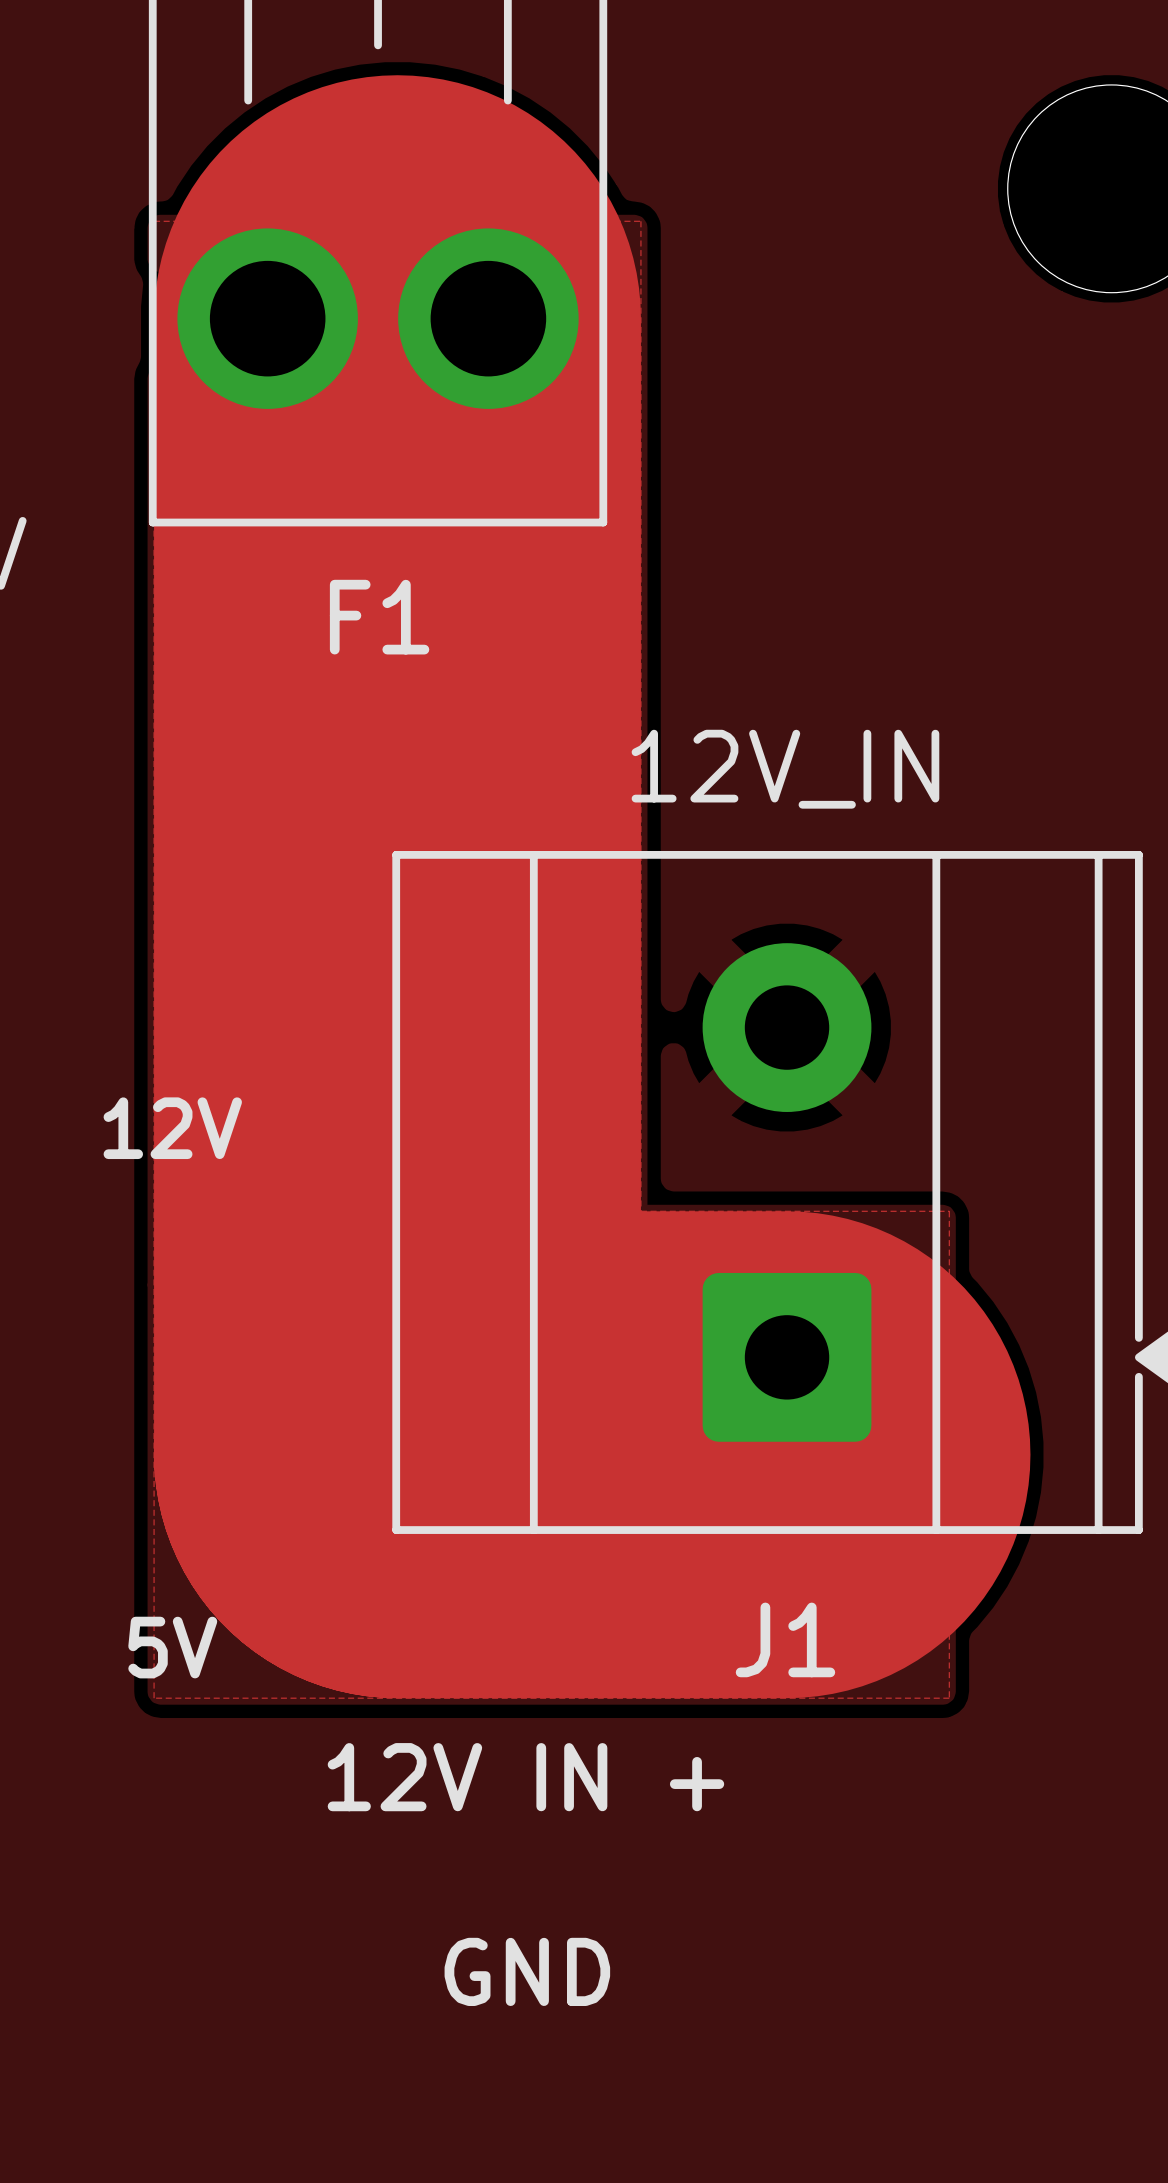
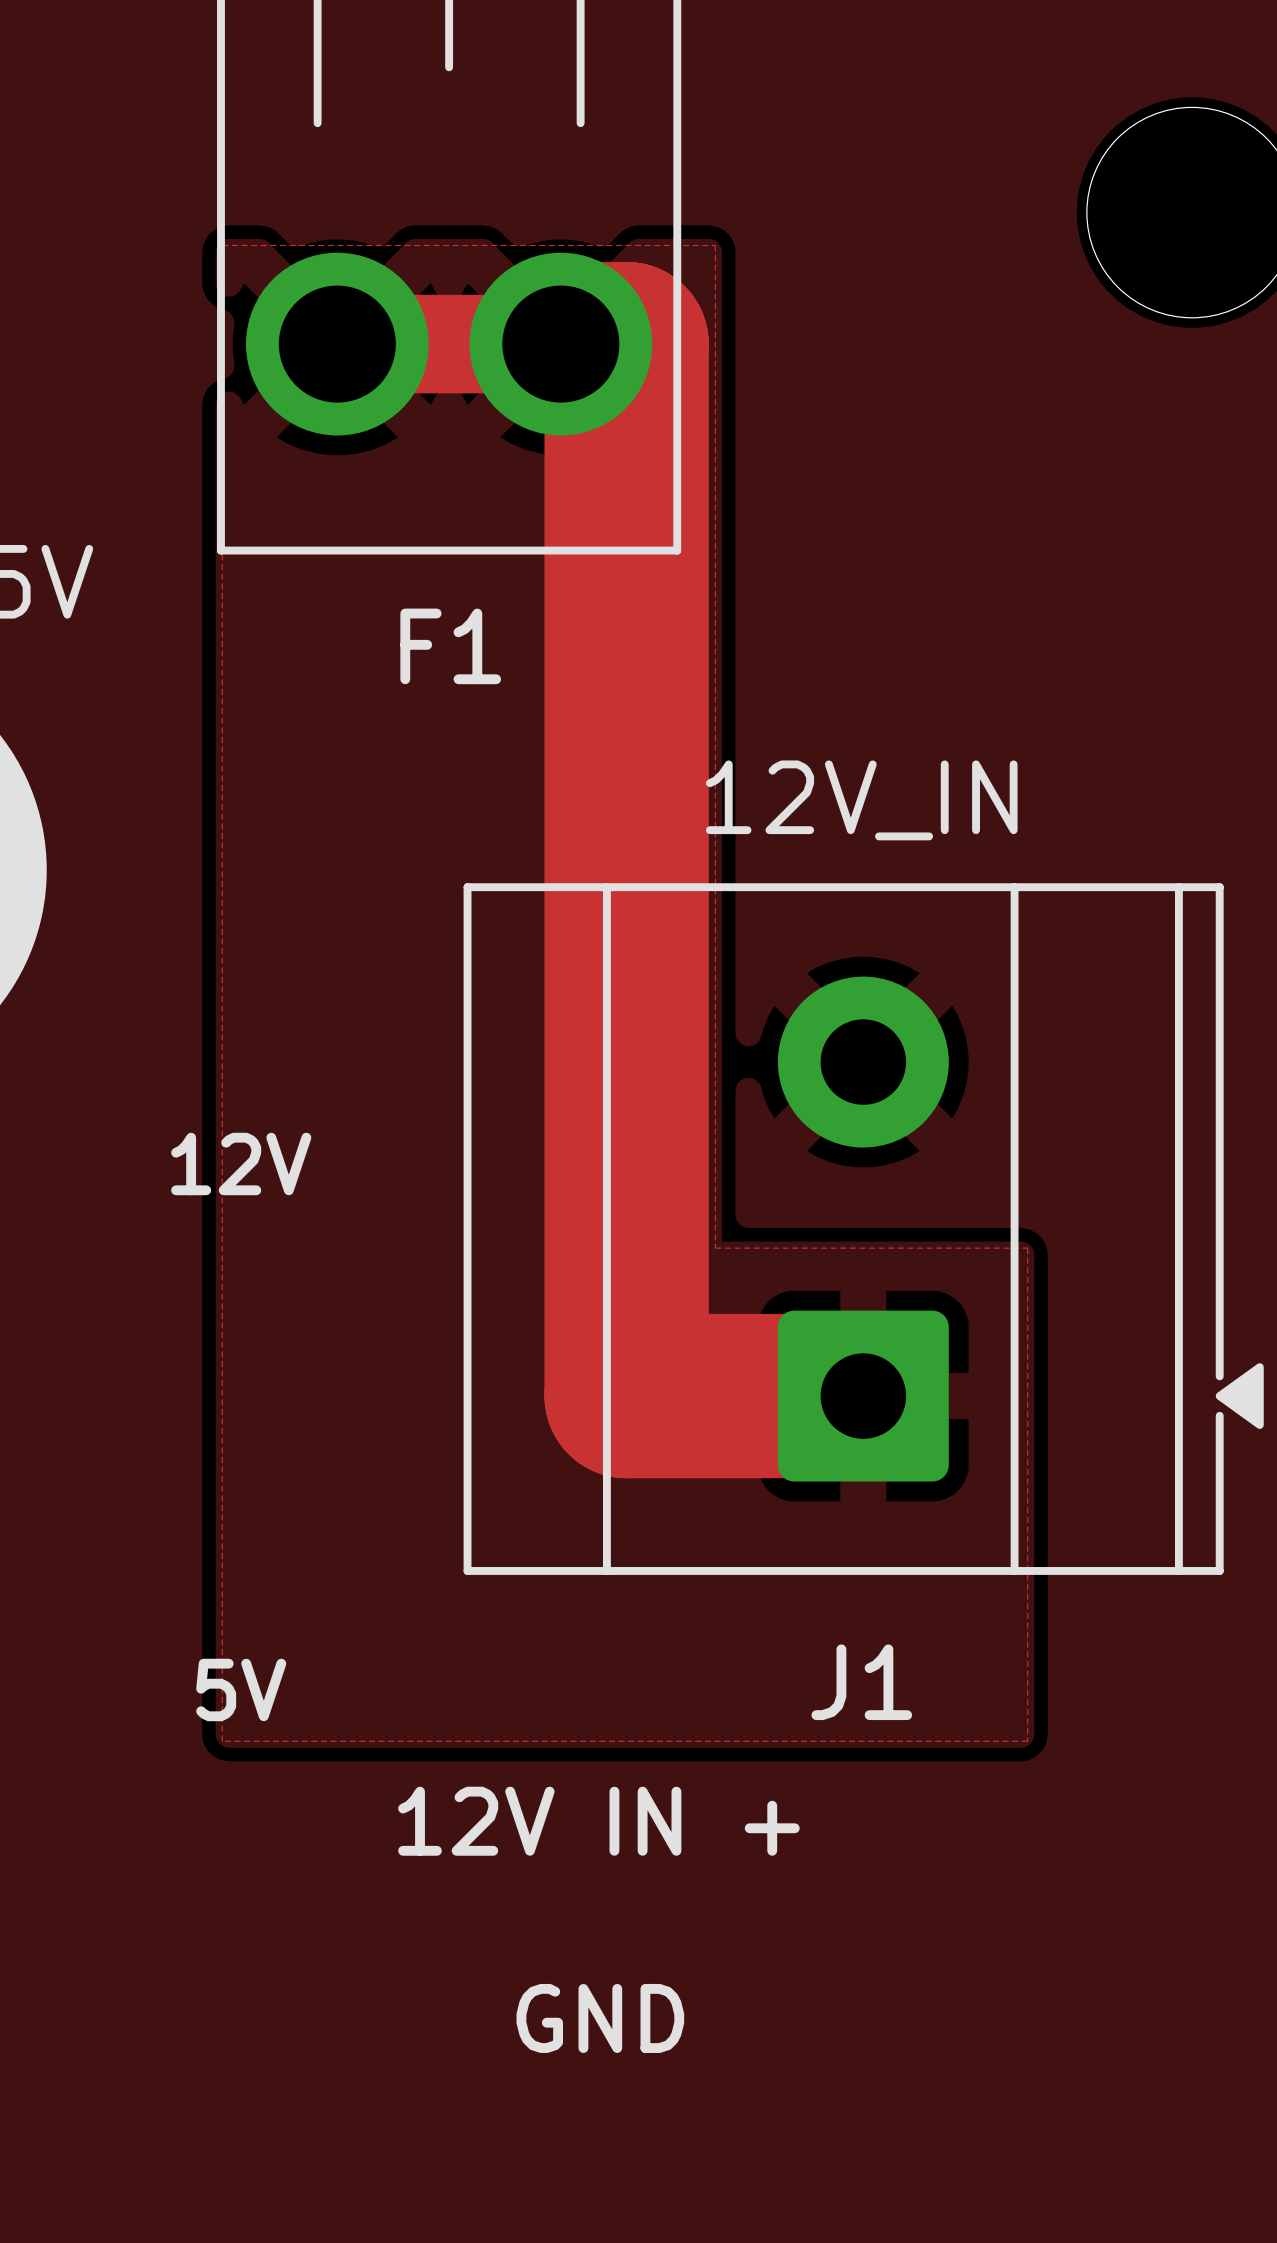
track: (397, 318) (397, 1454) (787, 1454) (787, 1357) -> (560, 344) (626, 344) (626, 1396) (863, 1396)

